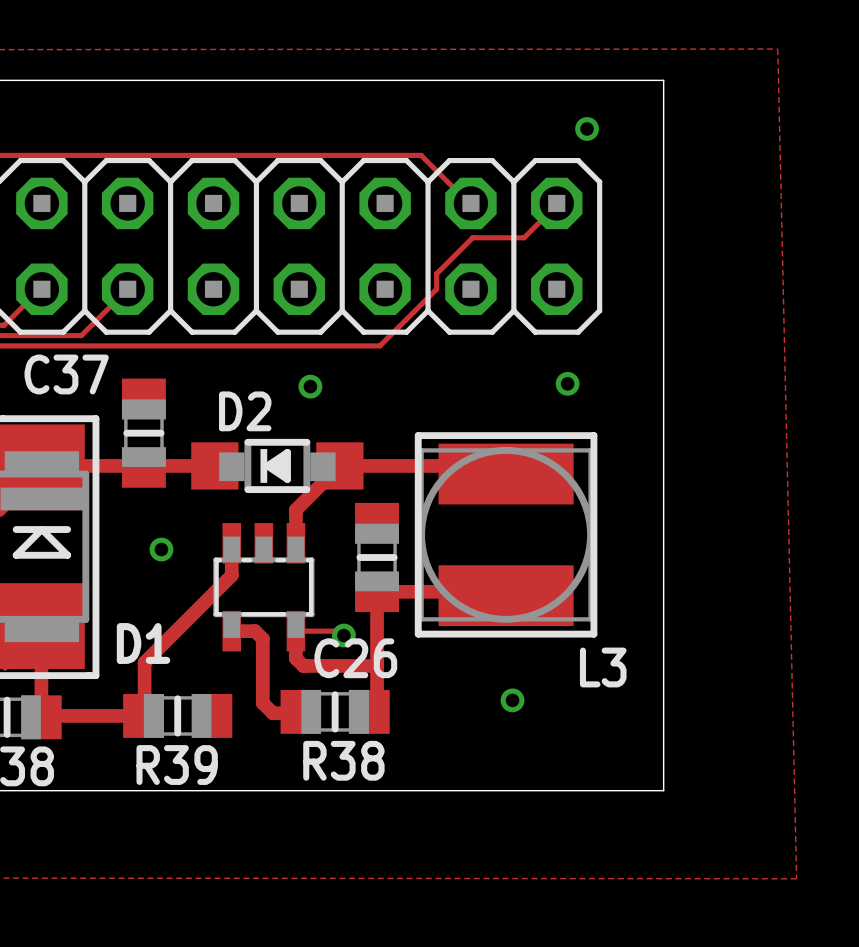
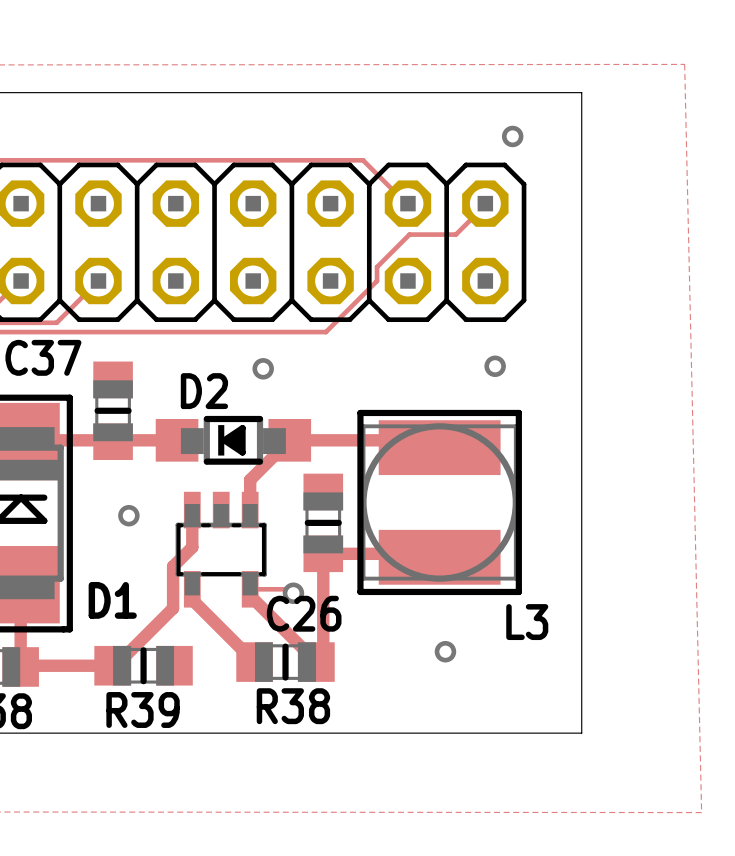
track: (231, 575) (144, 662) (144, 718) (143, 715) -> (192, 539) (192, 547) (173, 566) (173, 608) (115, 665) (112, 665)
track: (231, 631) (255, 631) (262, 638) (262, 703) (272, 713) (300, 711) -> (192, 599) (254, 662)
track: (295, 638) (295, 658) (303, 665) (375, 665) (377, 664) -> (250, 595) (316, 662)

